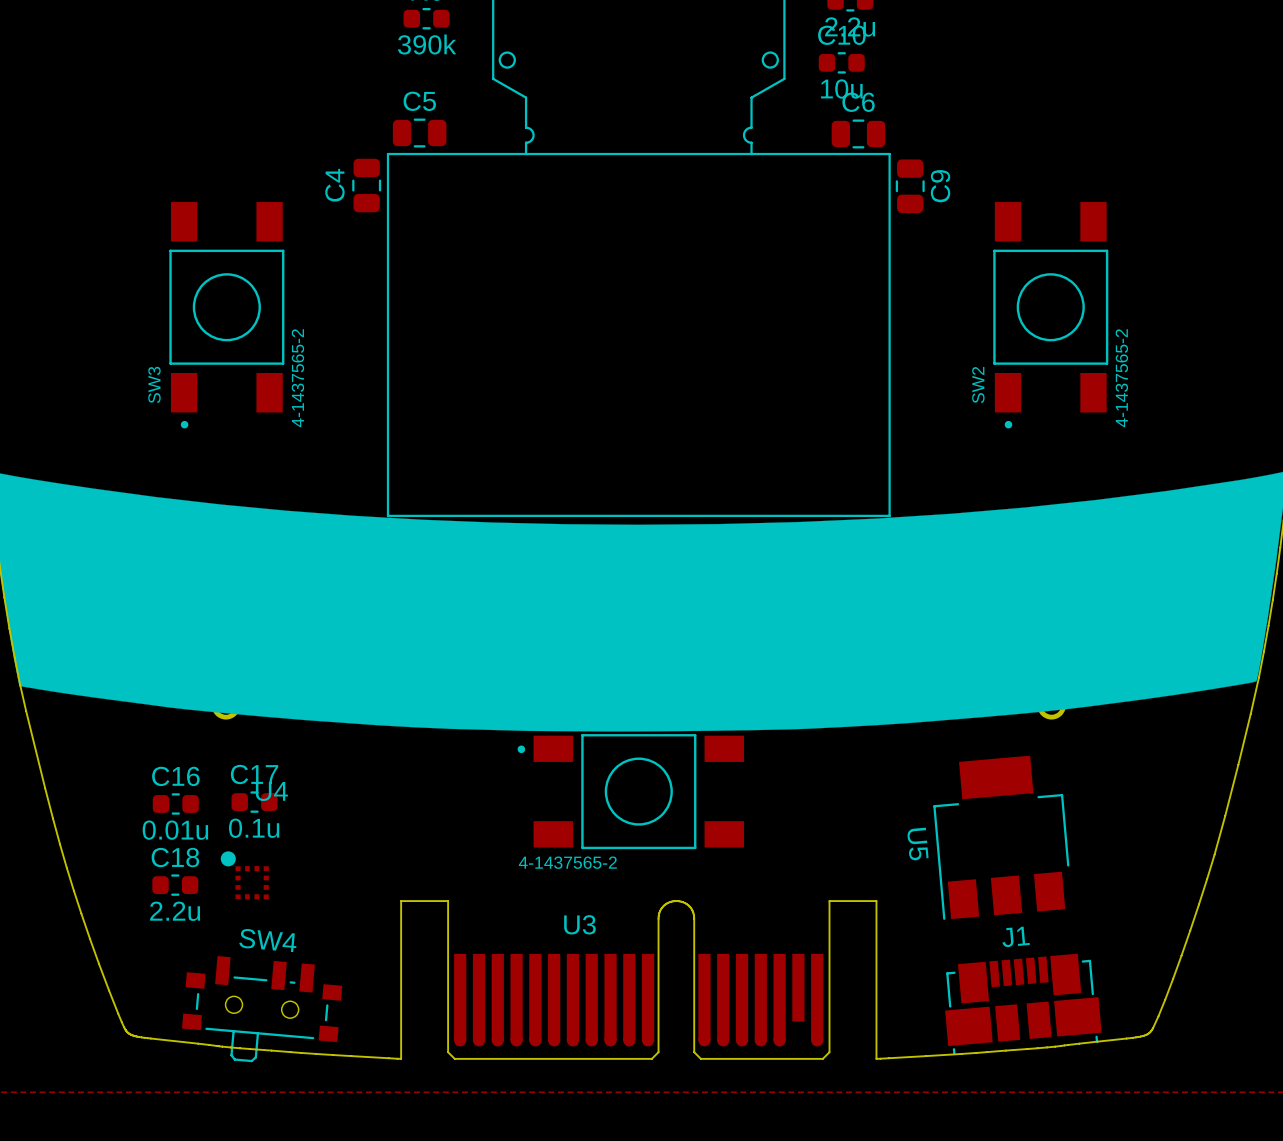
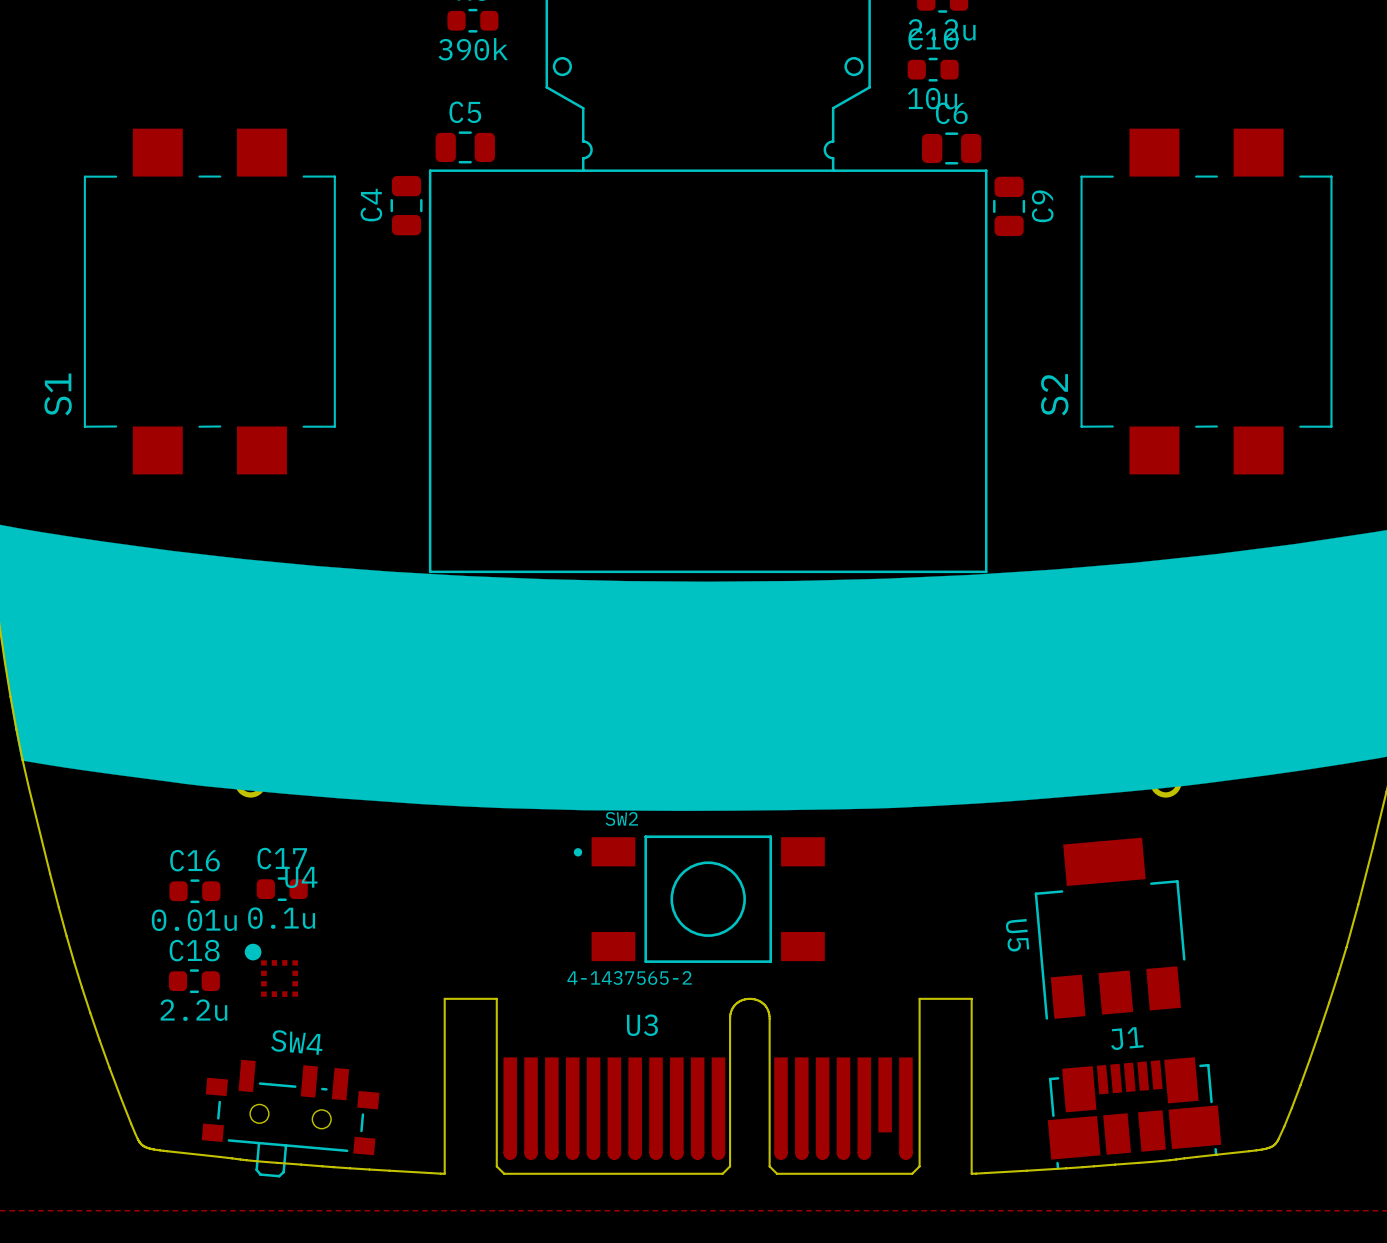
S1: none -> (209, 301)
S2: none -> (1206, 301)
SW3: 4-1437565-2 (226, 315) -> none
SW2 rotation: 0° (1050, 315) -> 90° clockwise (699, 899)
SW2 position: (1050, 315) -> (699, 899)
part: 4-1437565-2 (630, 791) -> none

